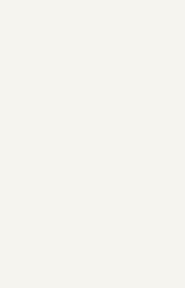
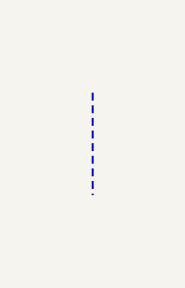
line: none -> (92, 92) (92, 195)

